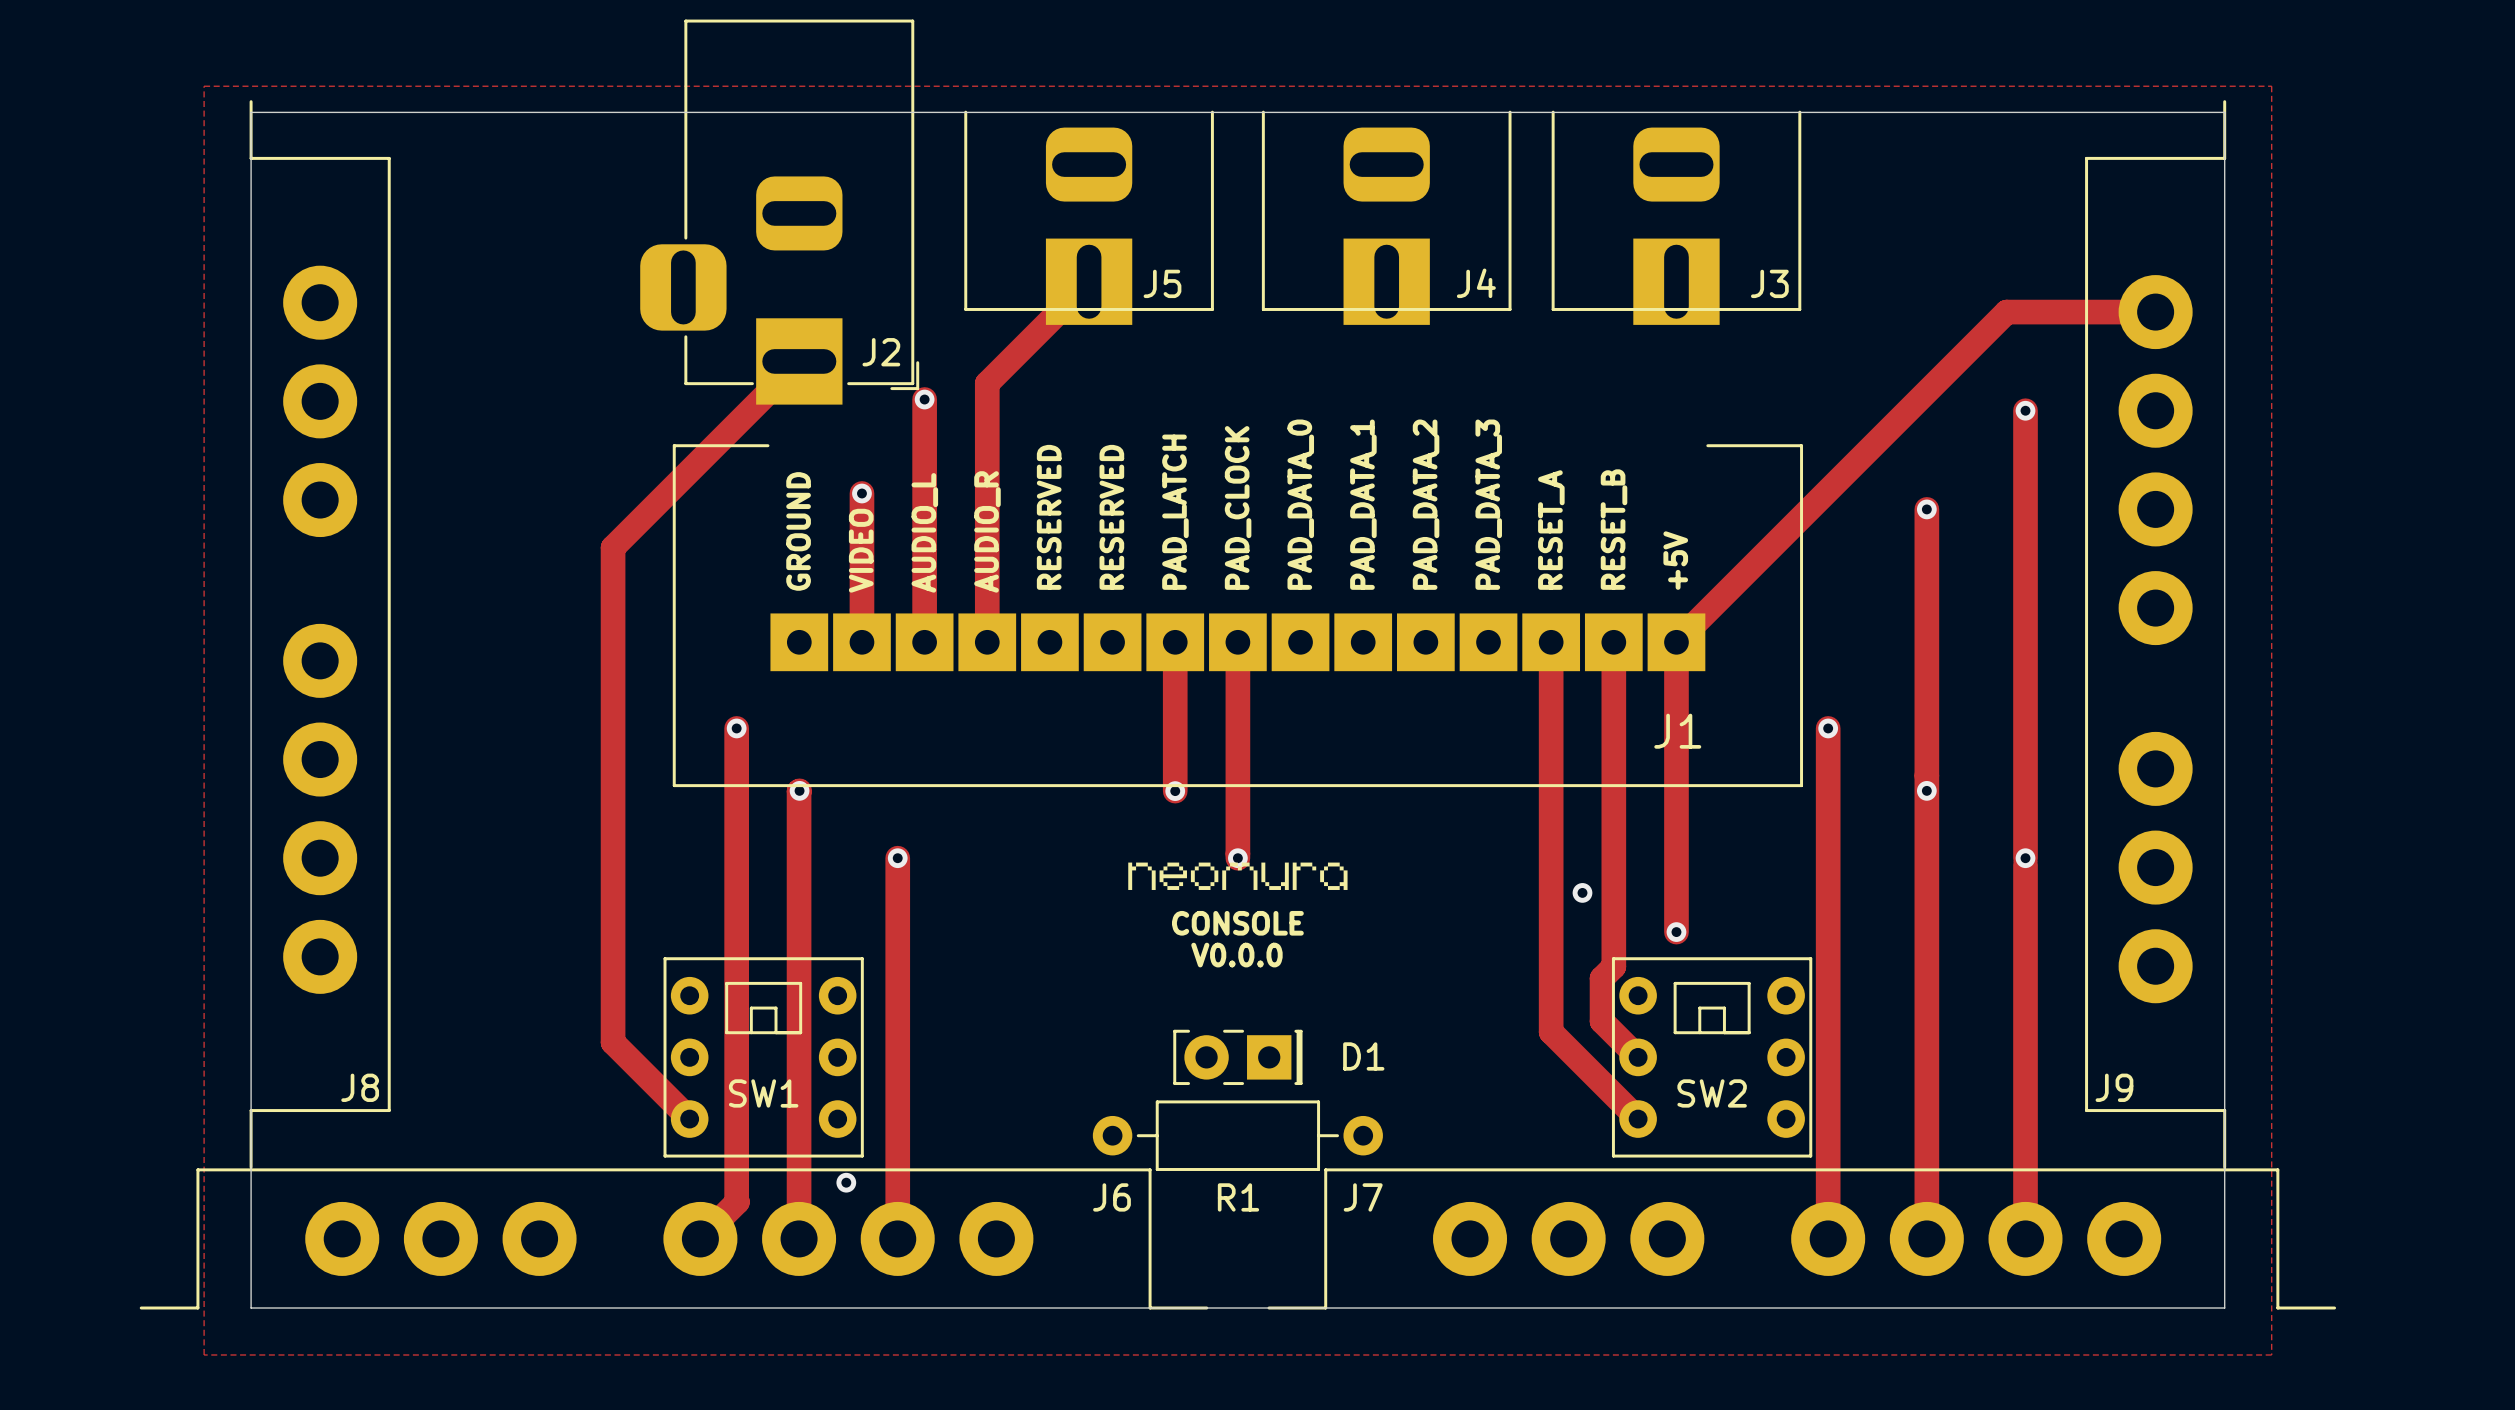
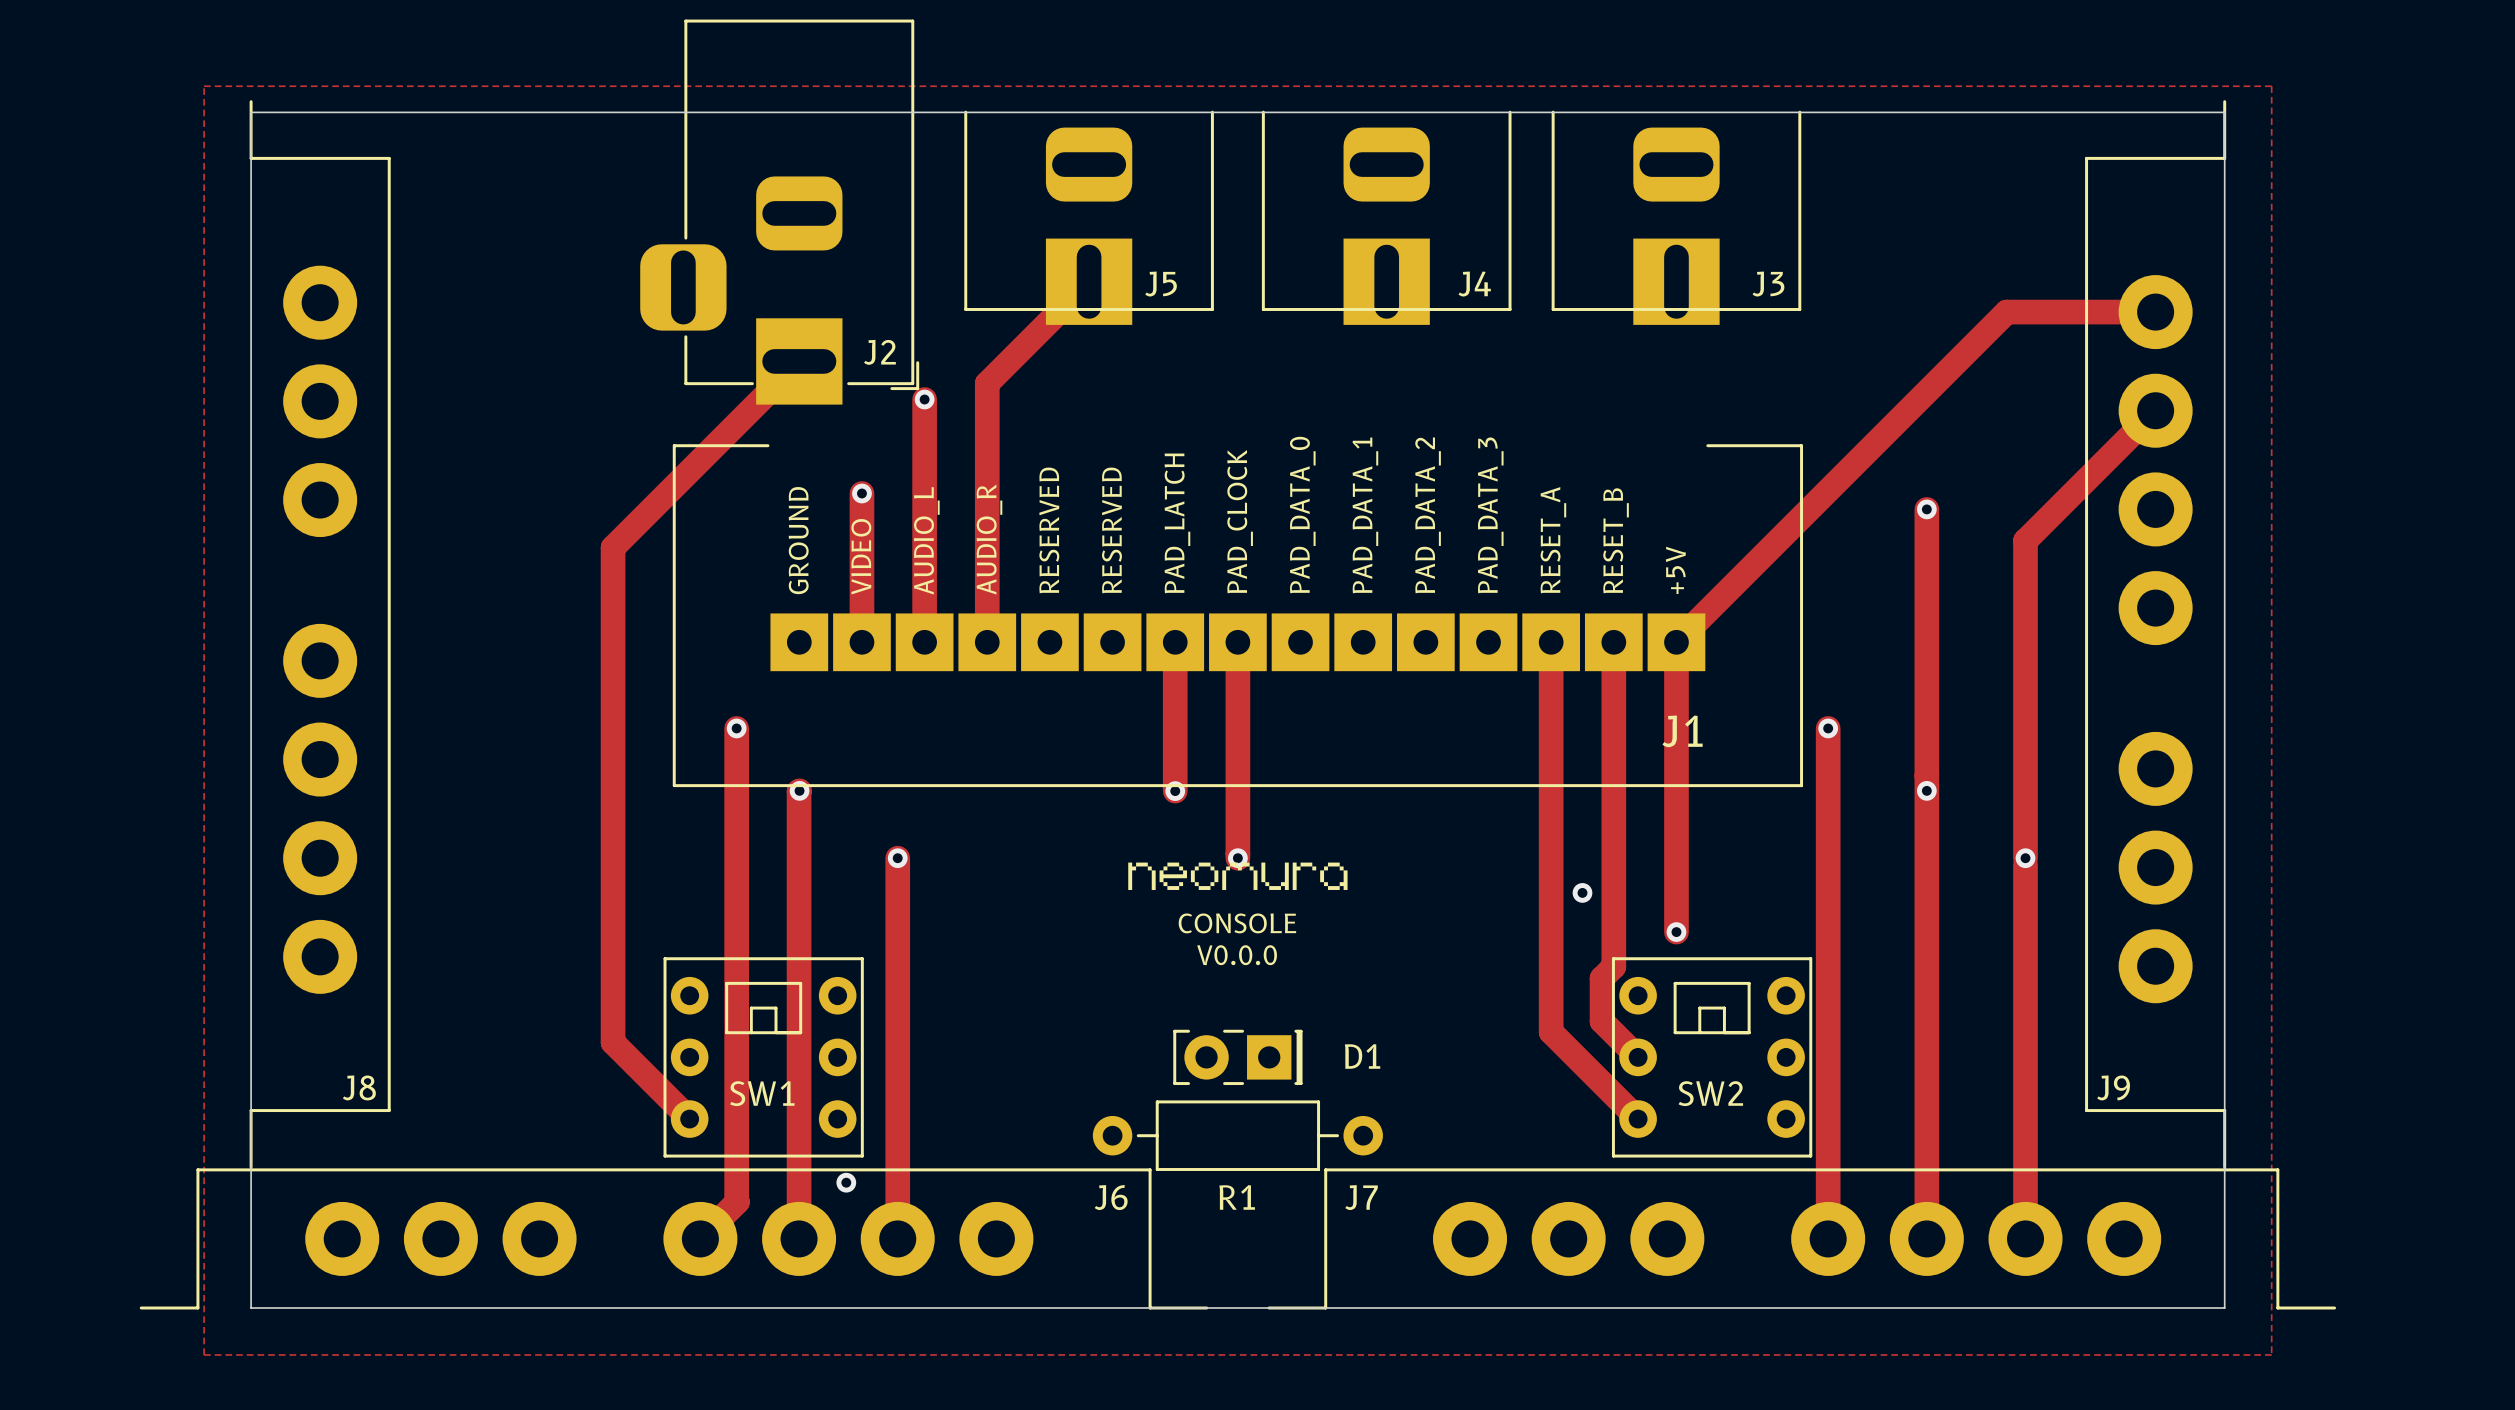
track: (2025, 410) (2025, 540) -> (2155, 410) (2025, 540)
via: (2025, 410) -> none

